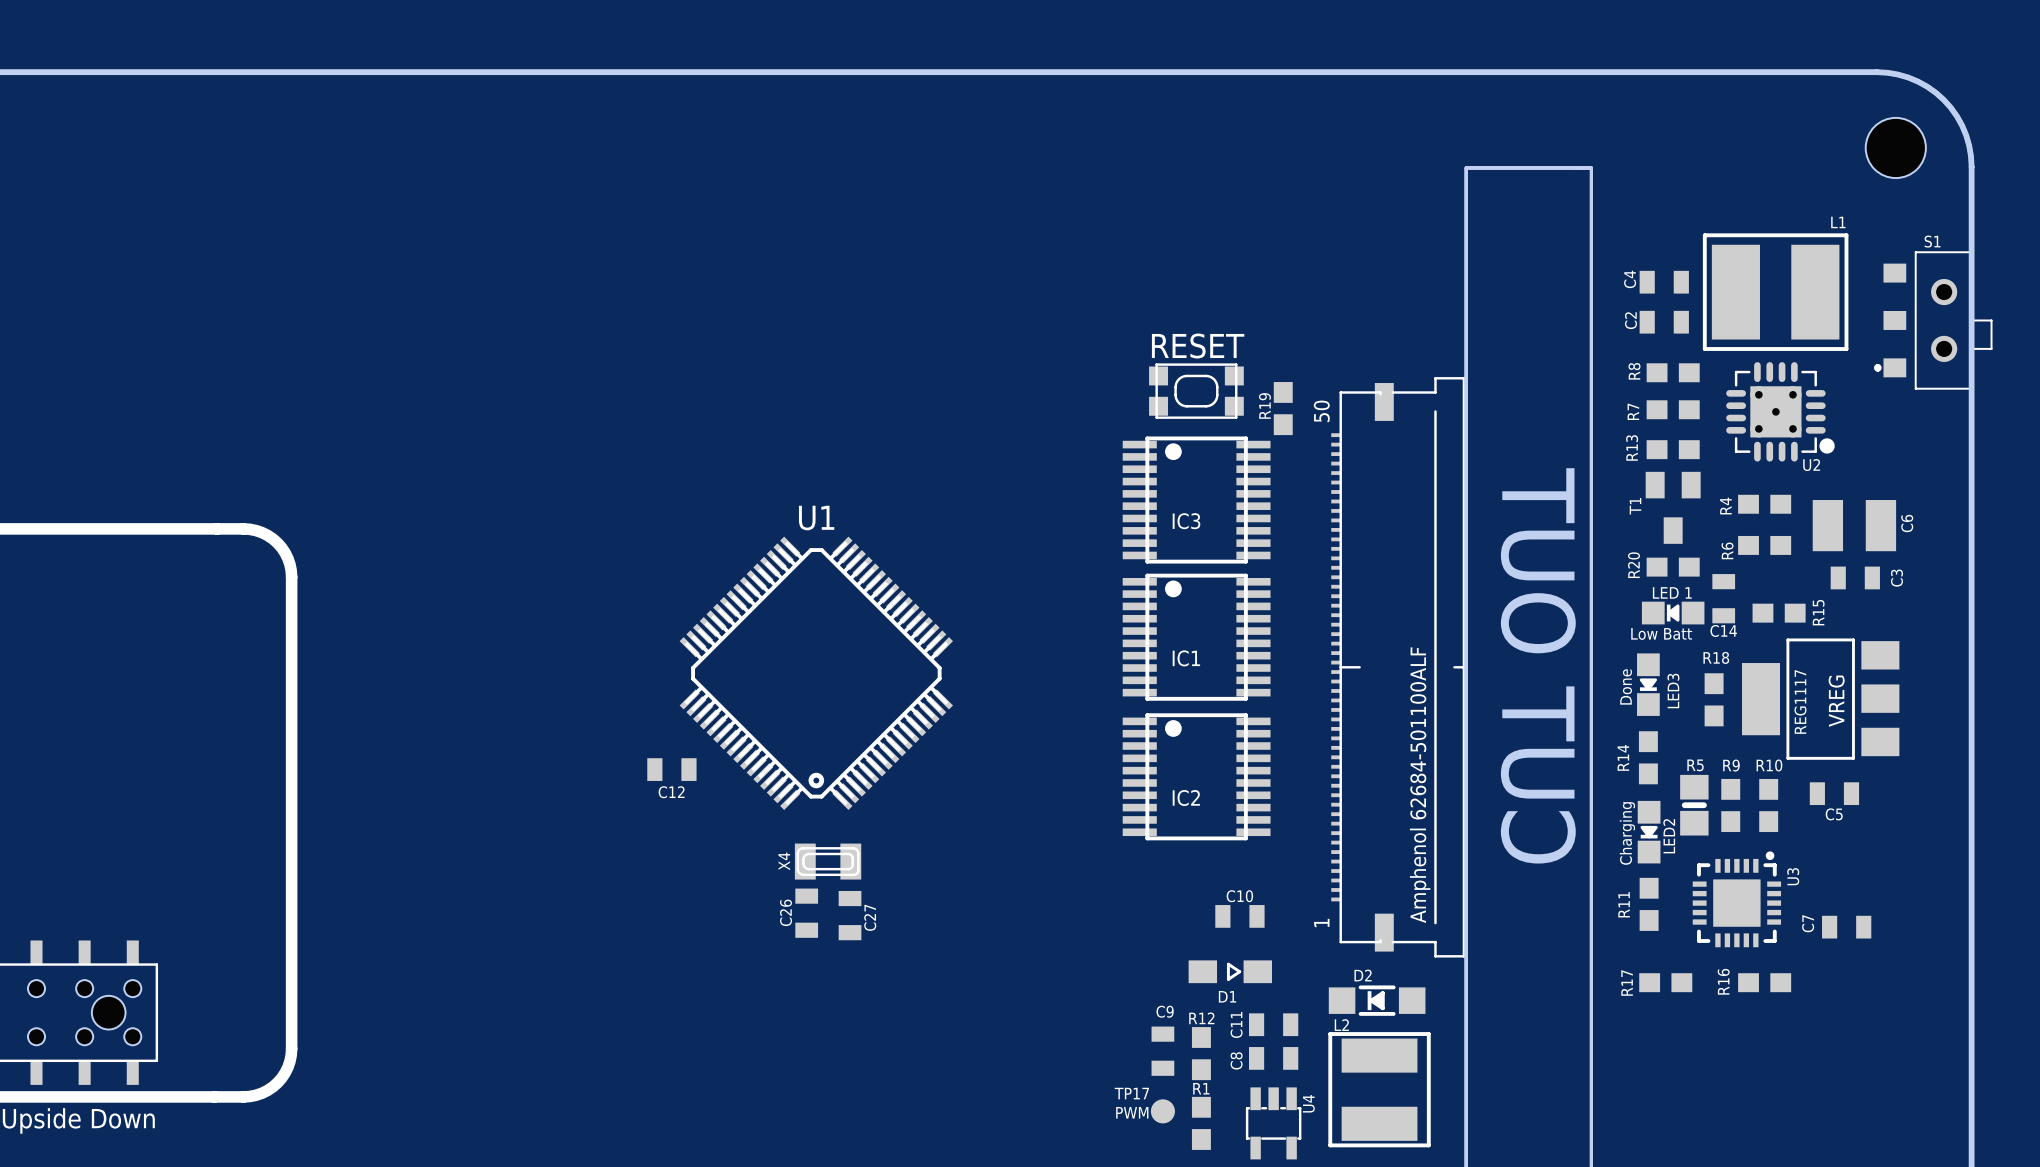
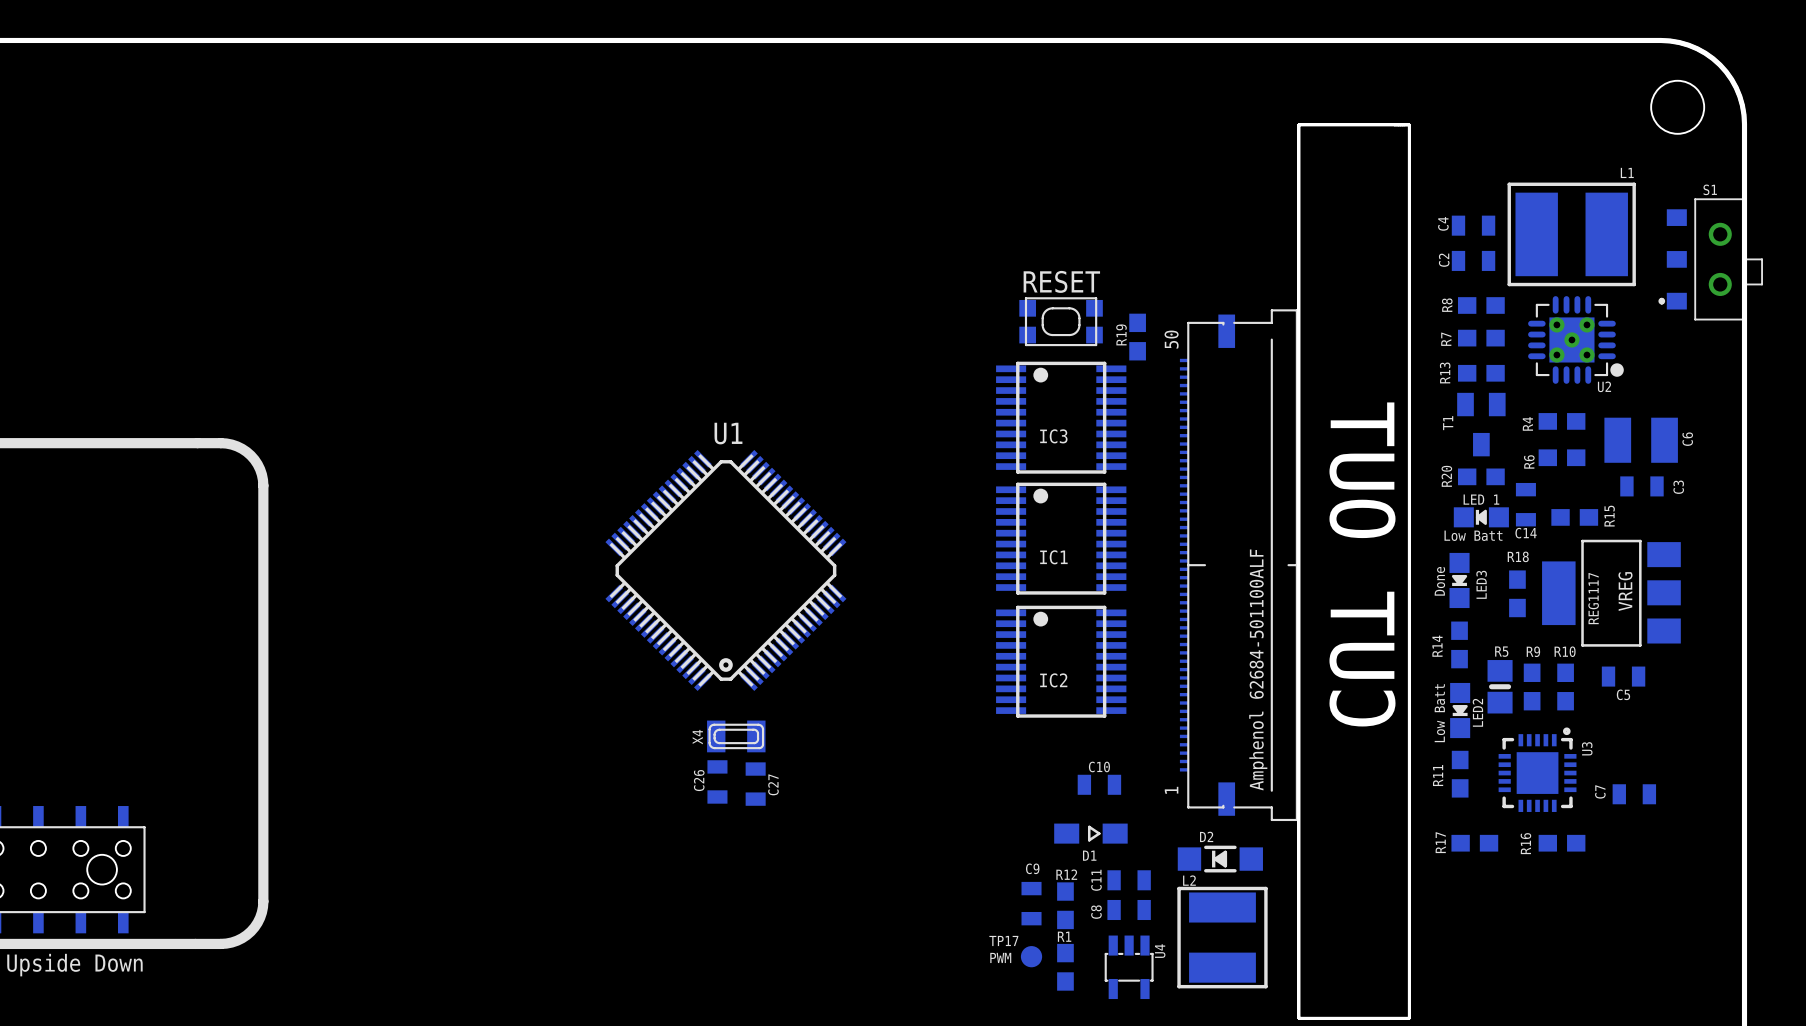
C12: (671, 769) -> none
text: Charging (1627, 833) -> Low Batt (1439, 713)

